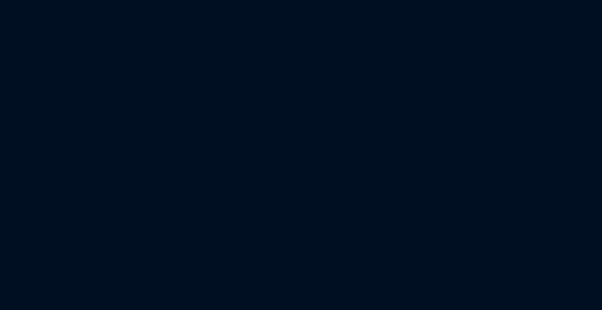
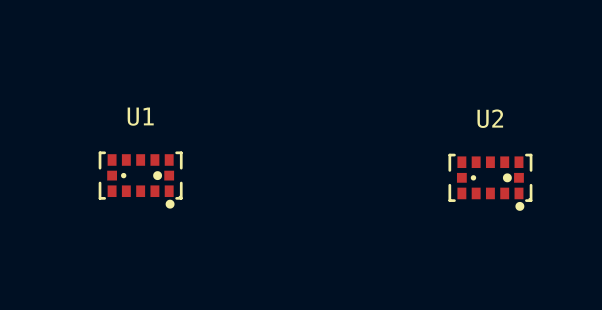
U1: none -> (140, 180)
U2: none -> (490, 182)

